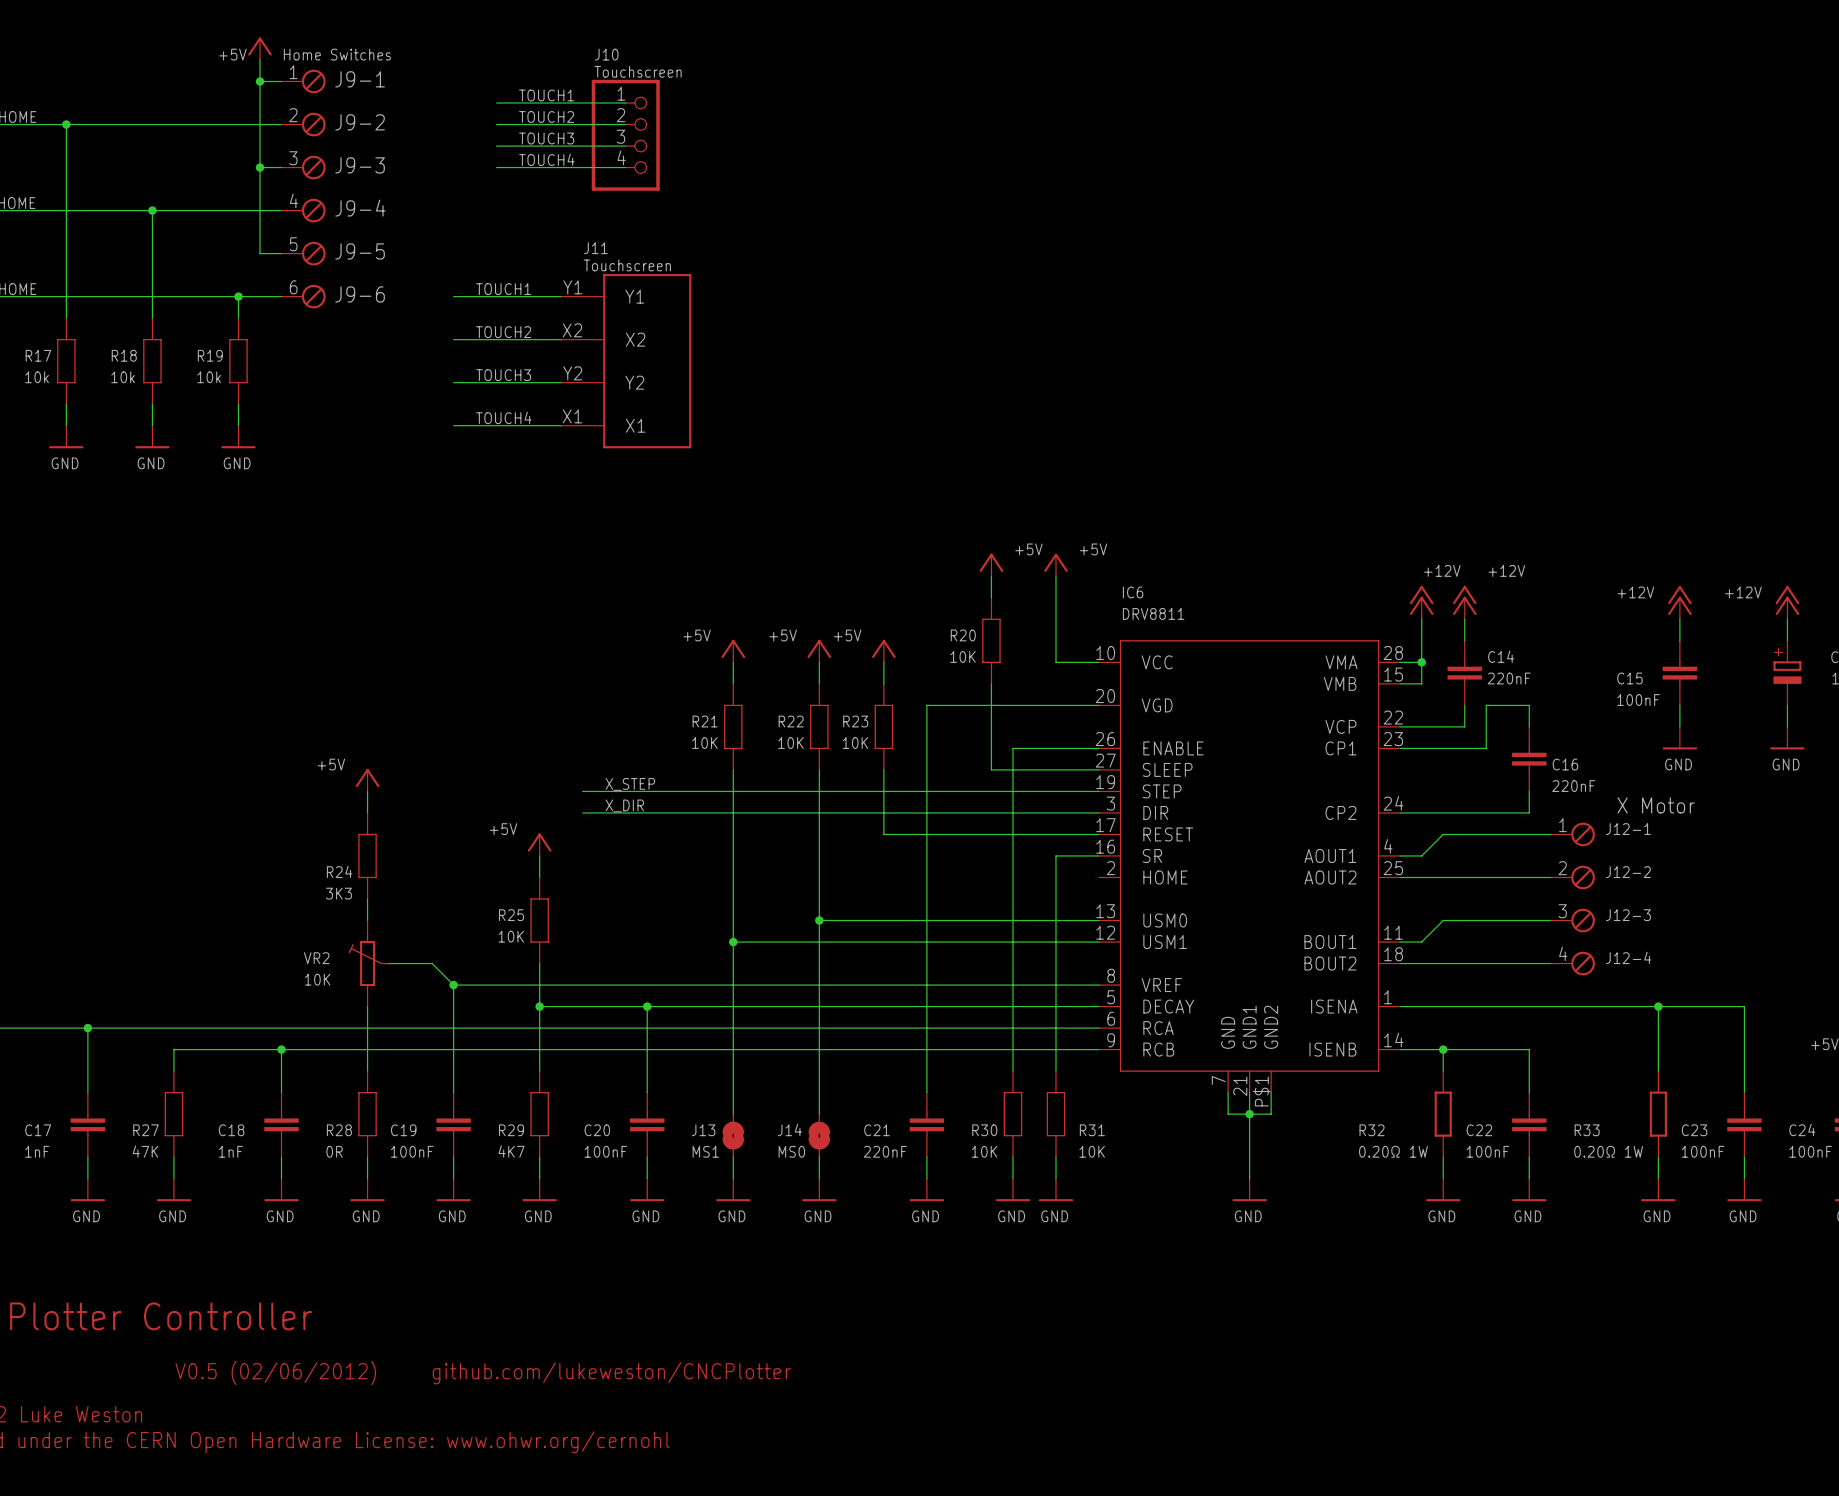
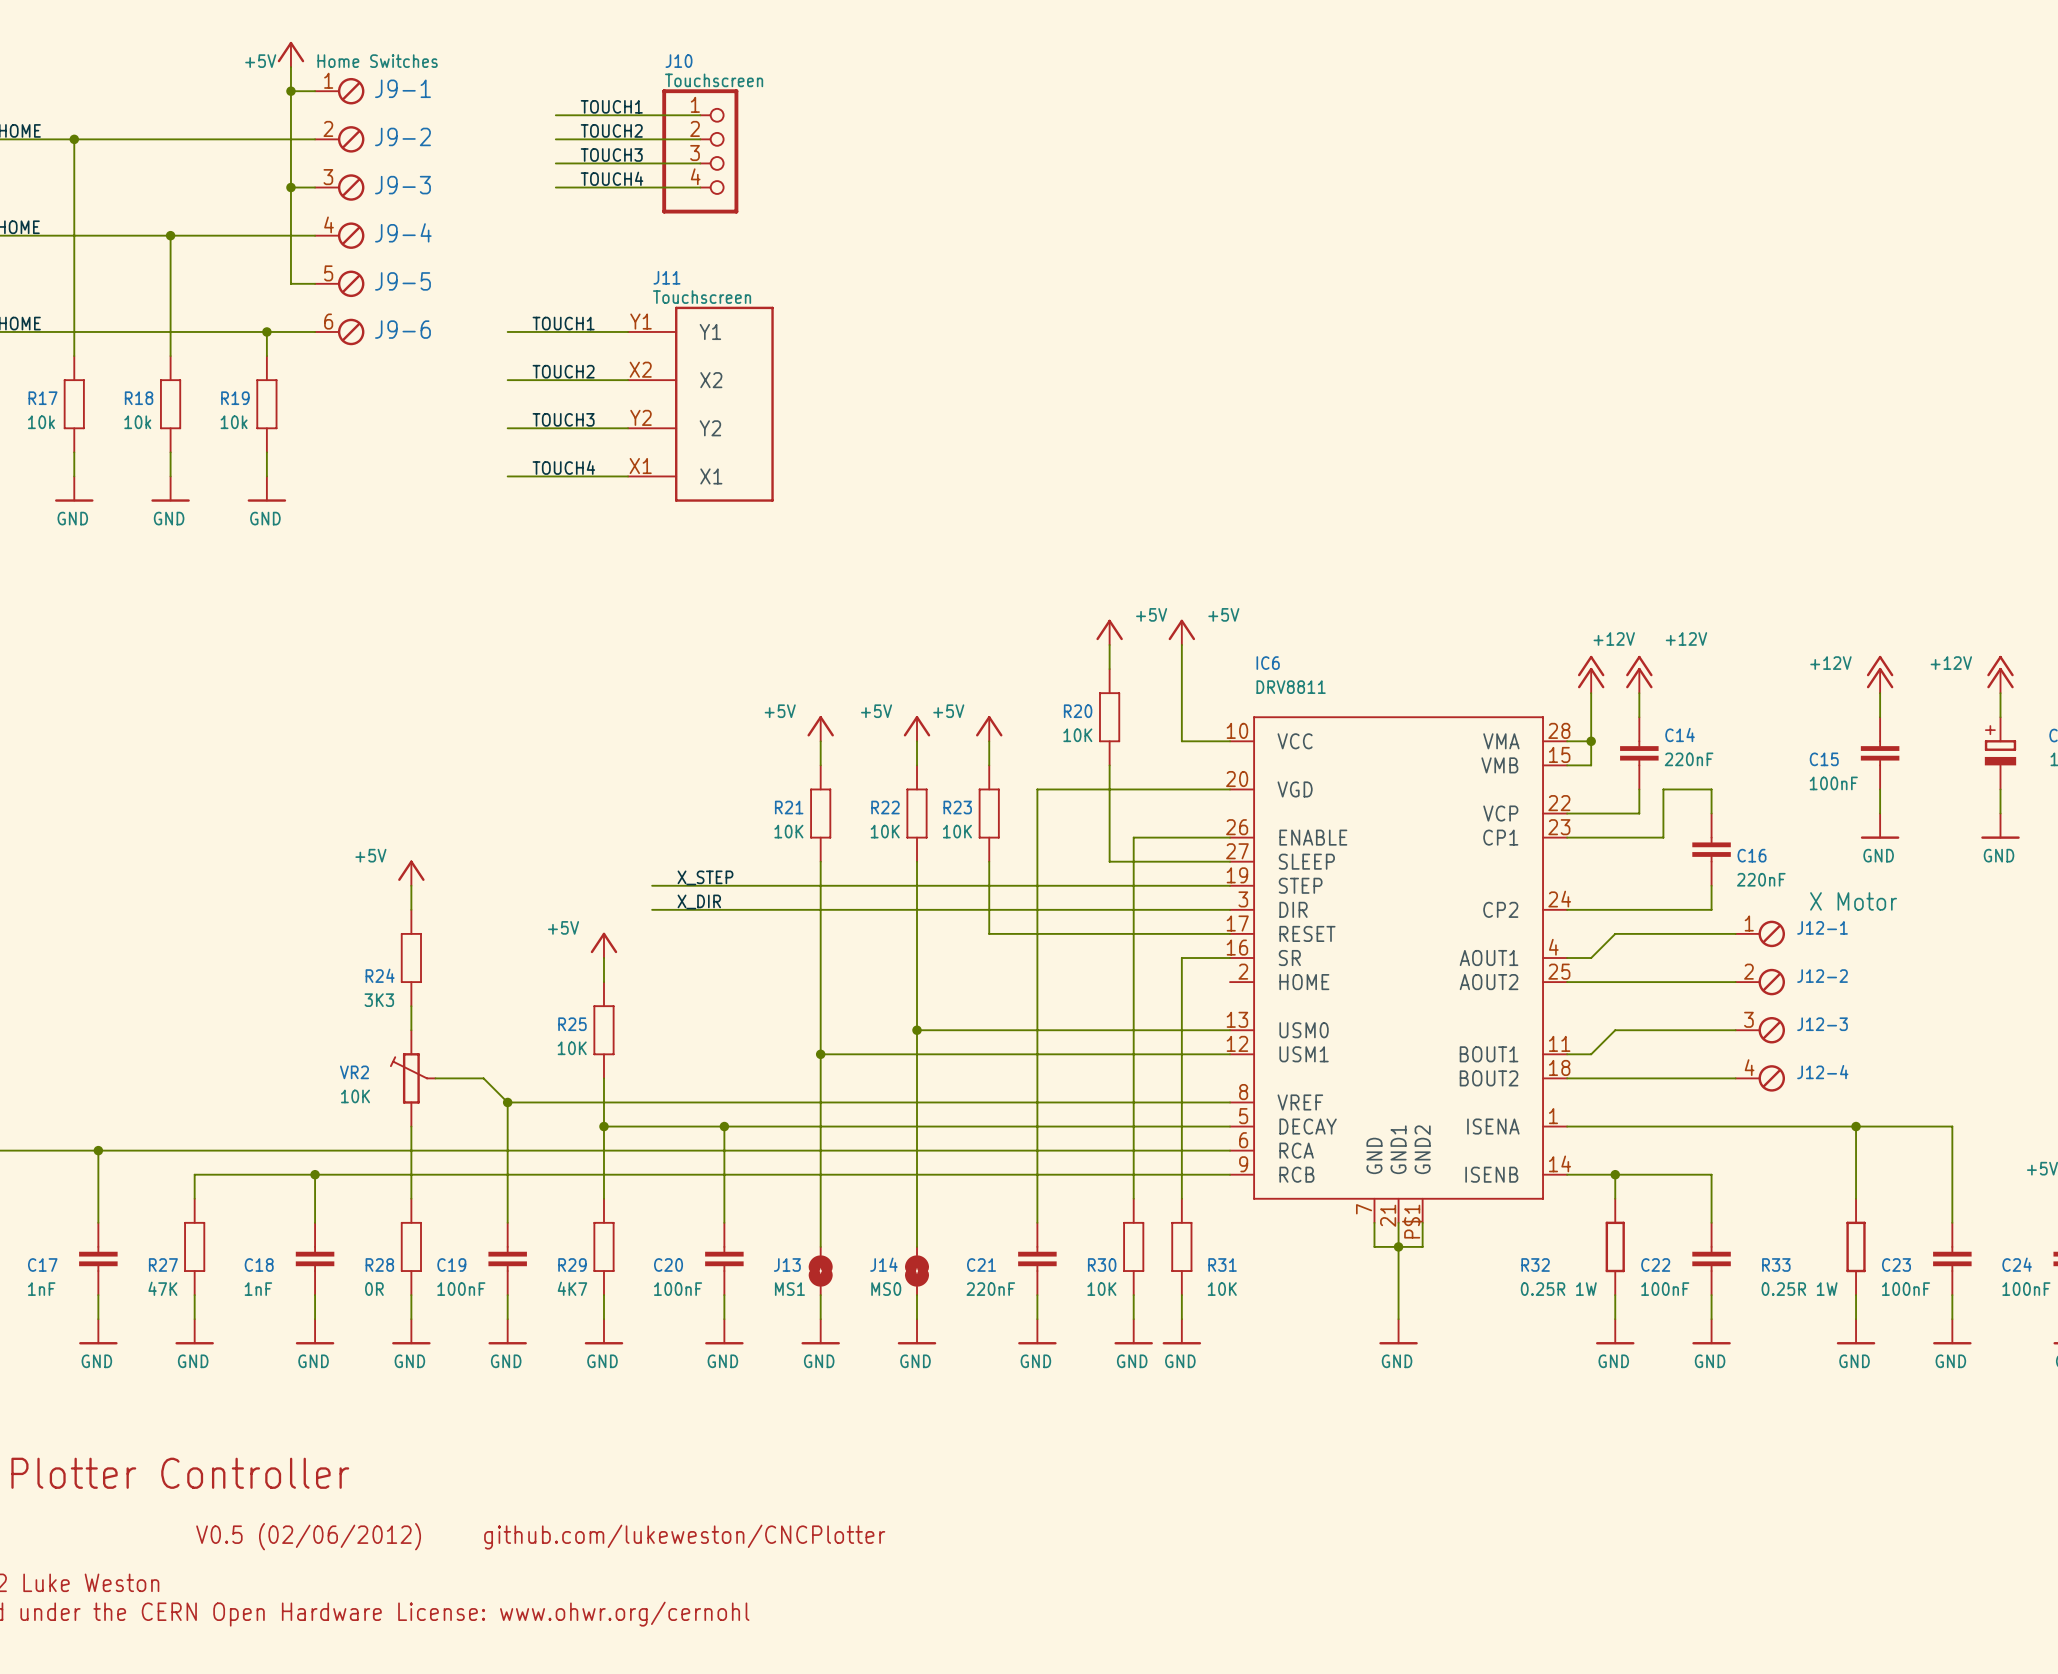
R32 value: 0.20Ω 1W (1393, 1151) -> 0.25R 1W (1558, 1289)
R33 value: 0.20Ω 1W (1608, 1151) -> 0.25R 1W (1799, 1289)

